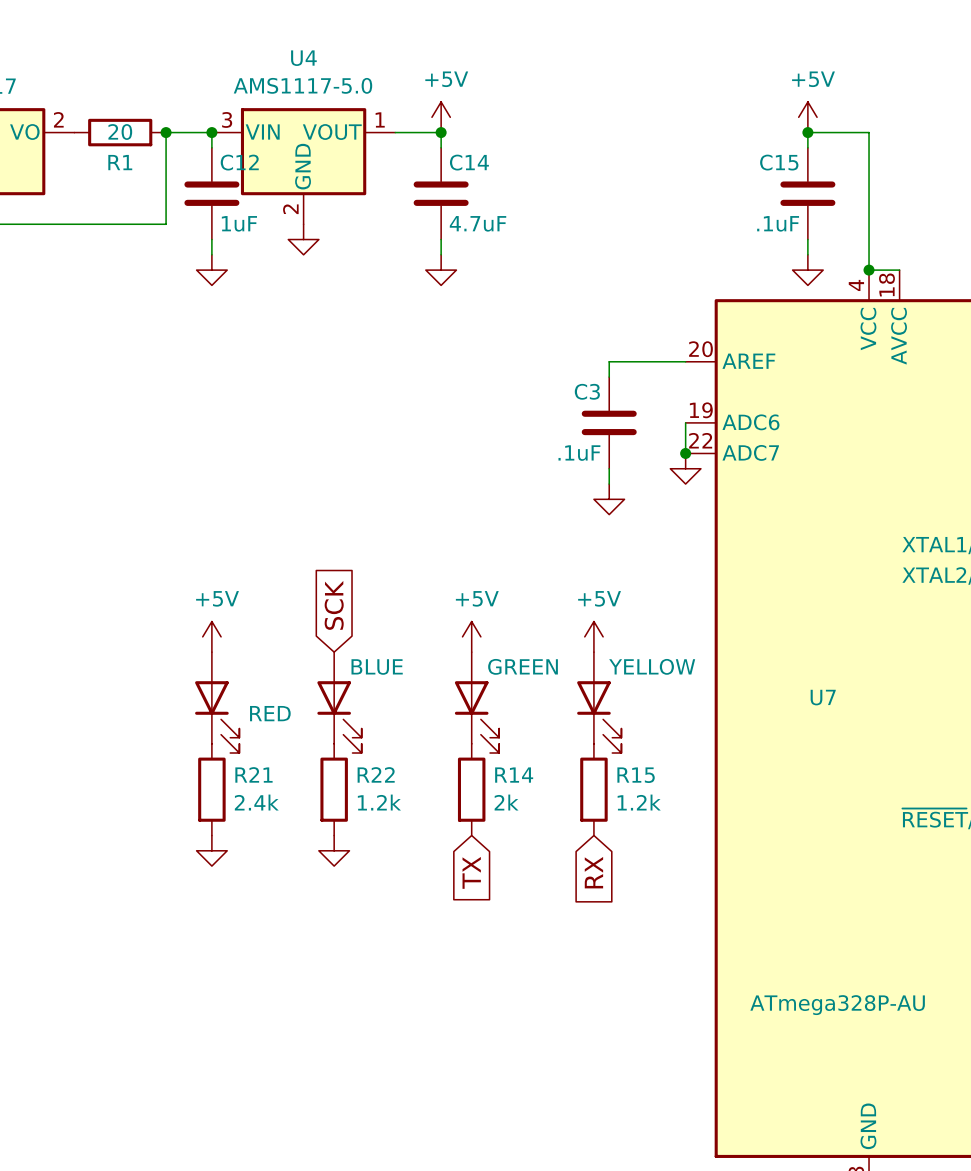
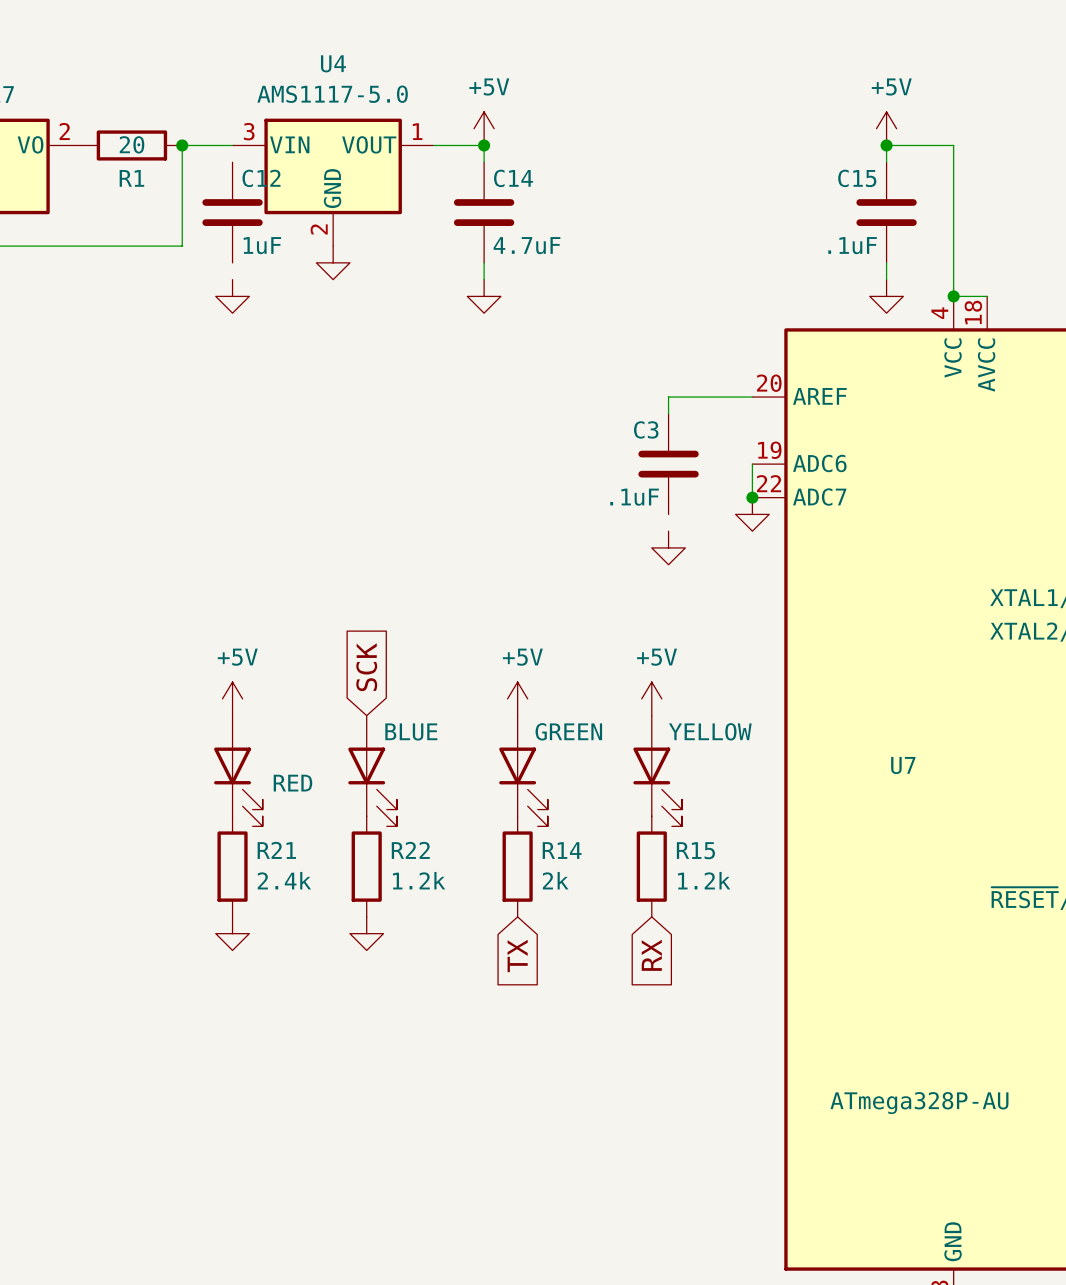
wire: (211, 132) (211, 147) -> none
junction: (211, 132) -> none
wire: (211, 239) (211, 254) -> none
wire: (609, 468) (609, 484) -> none

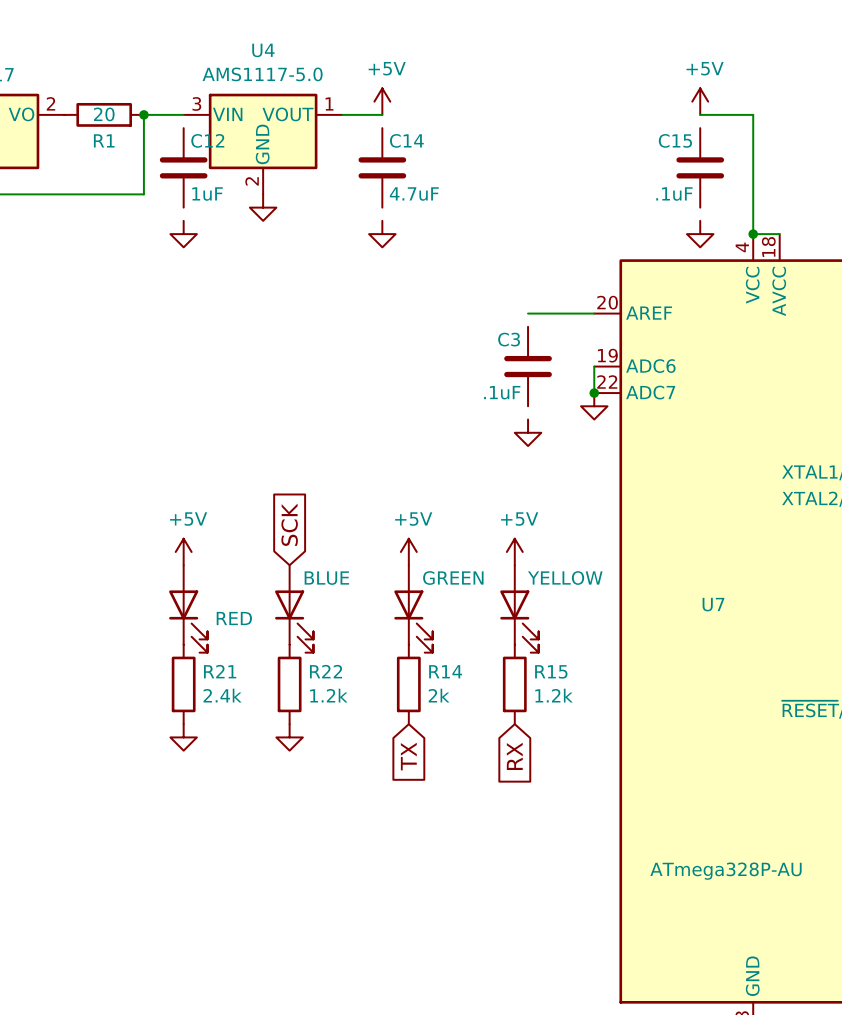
wire: (484, 145) (484, 162) -> none
junction: (484, 145) -> none
wire: (886, 145) (886, 162) -> none
junction: (886, 145) -> none
wire: (484, 262) (484, 279) -> none
wire: (886, 262) (886, 279) -> none
wire: (668, 397) (668, 413) -> none

